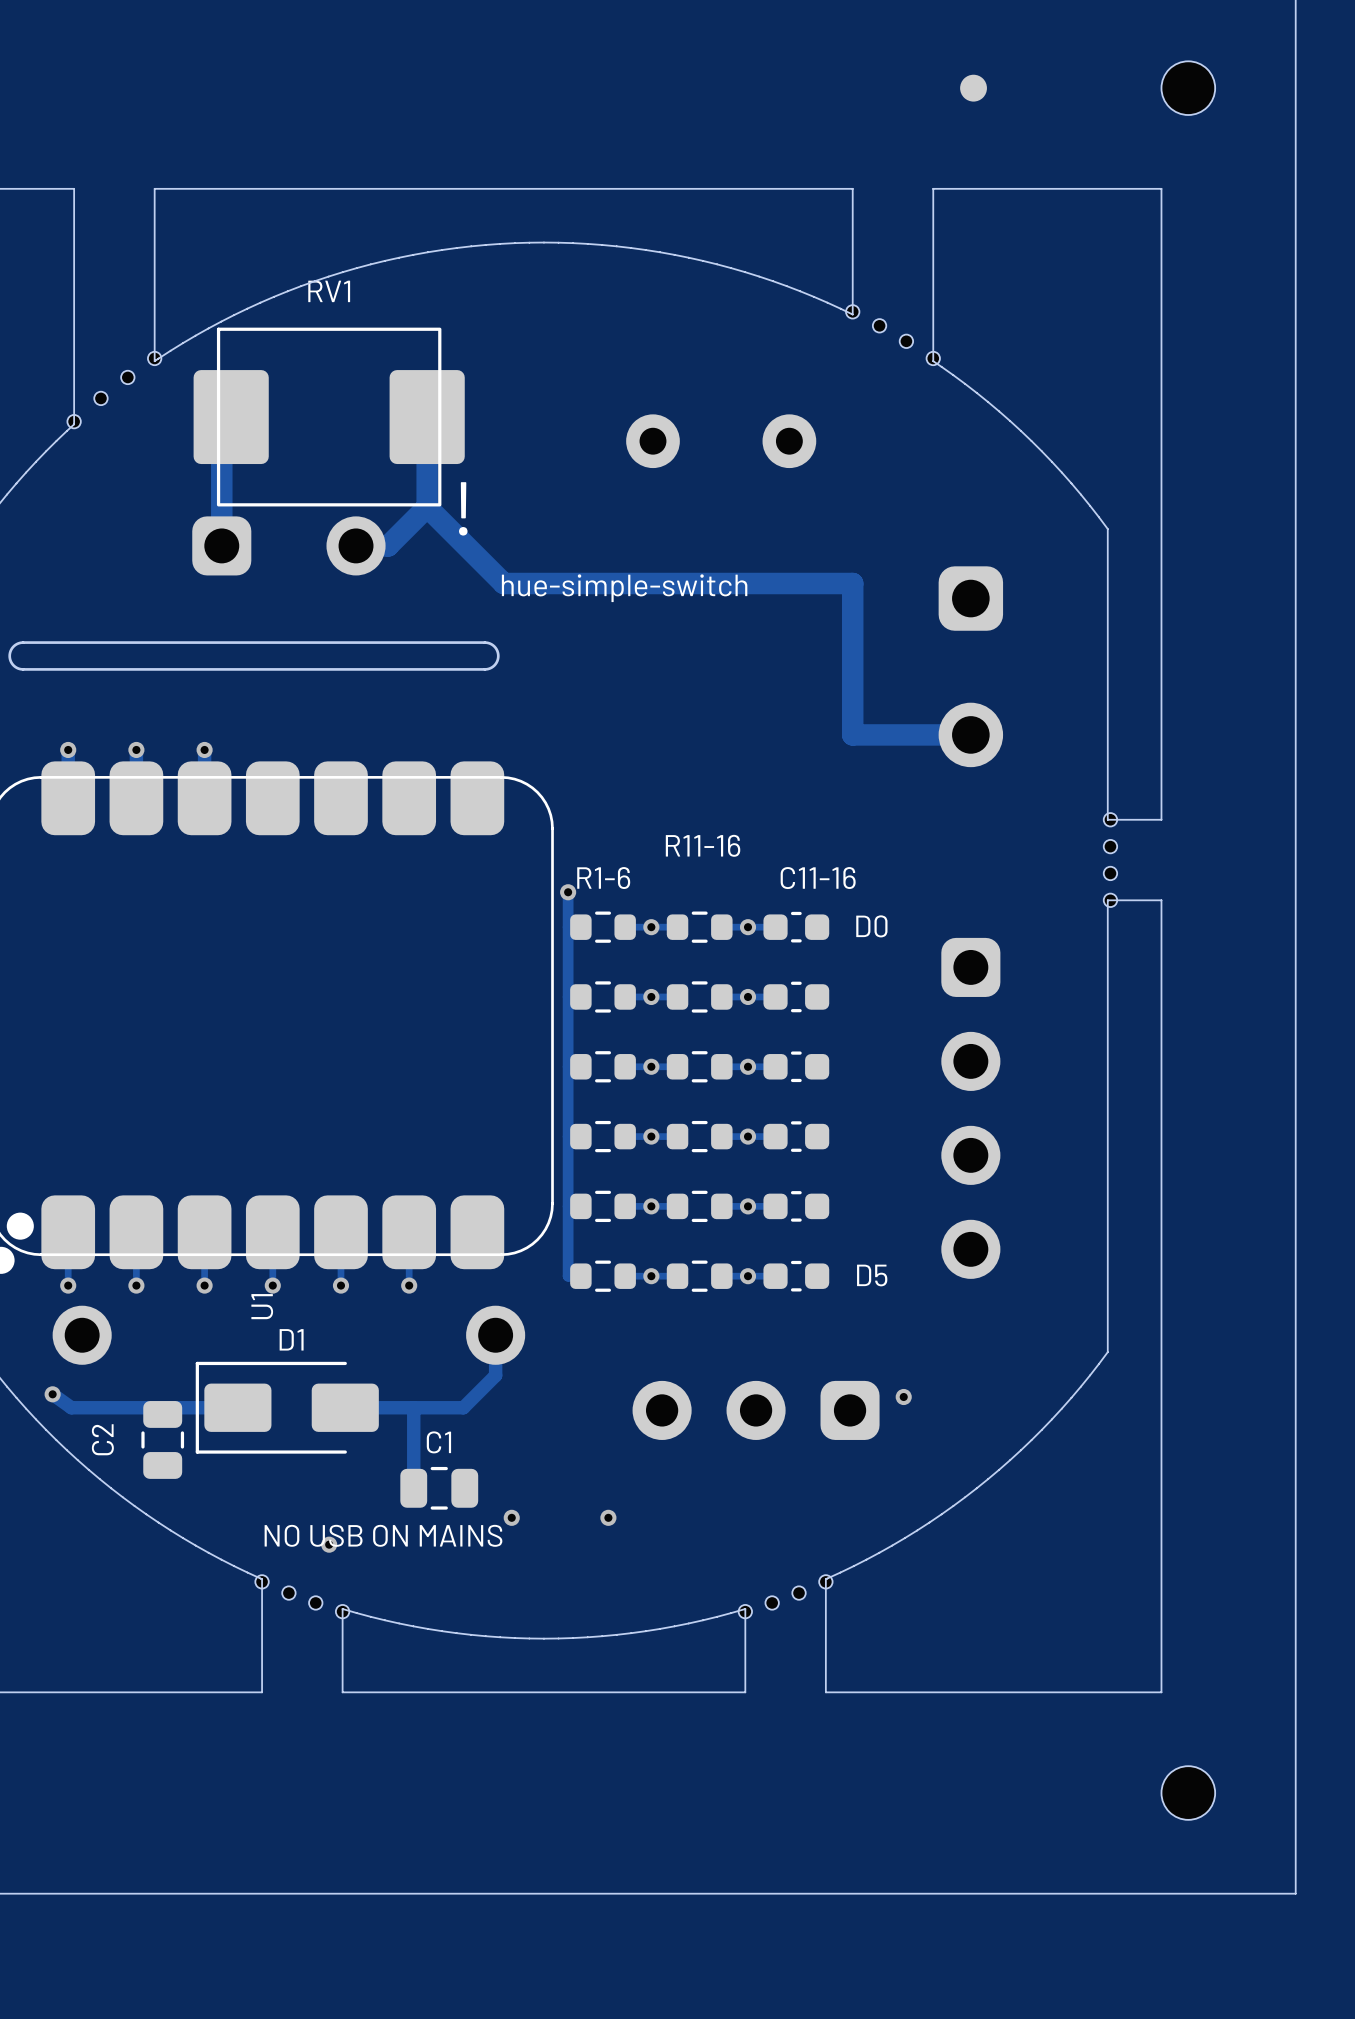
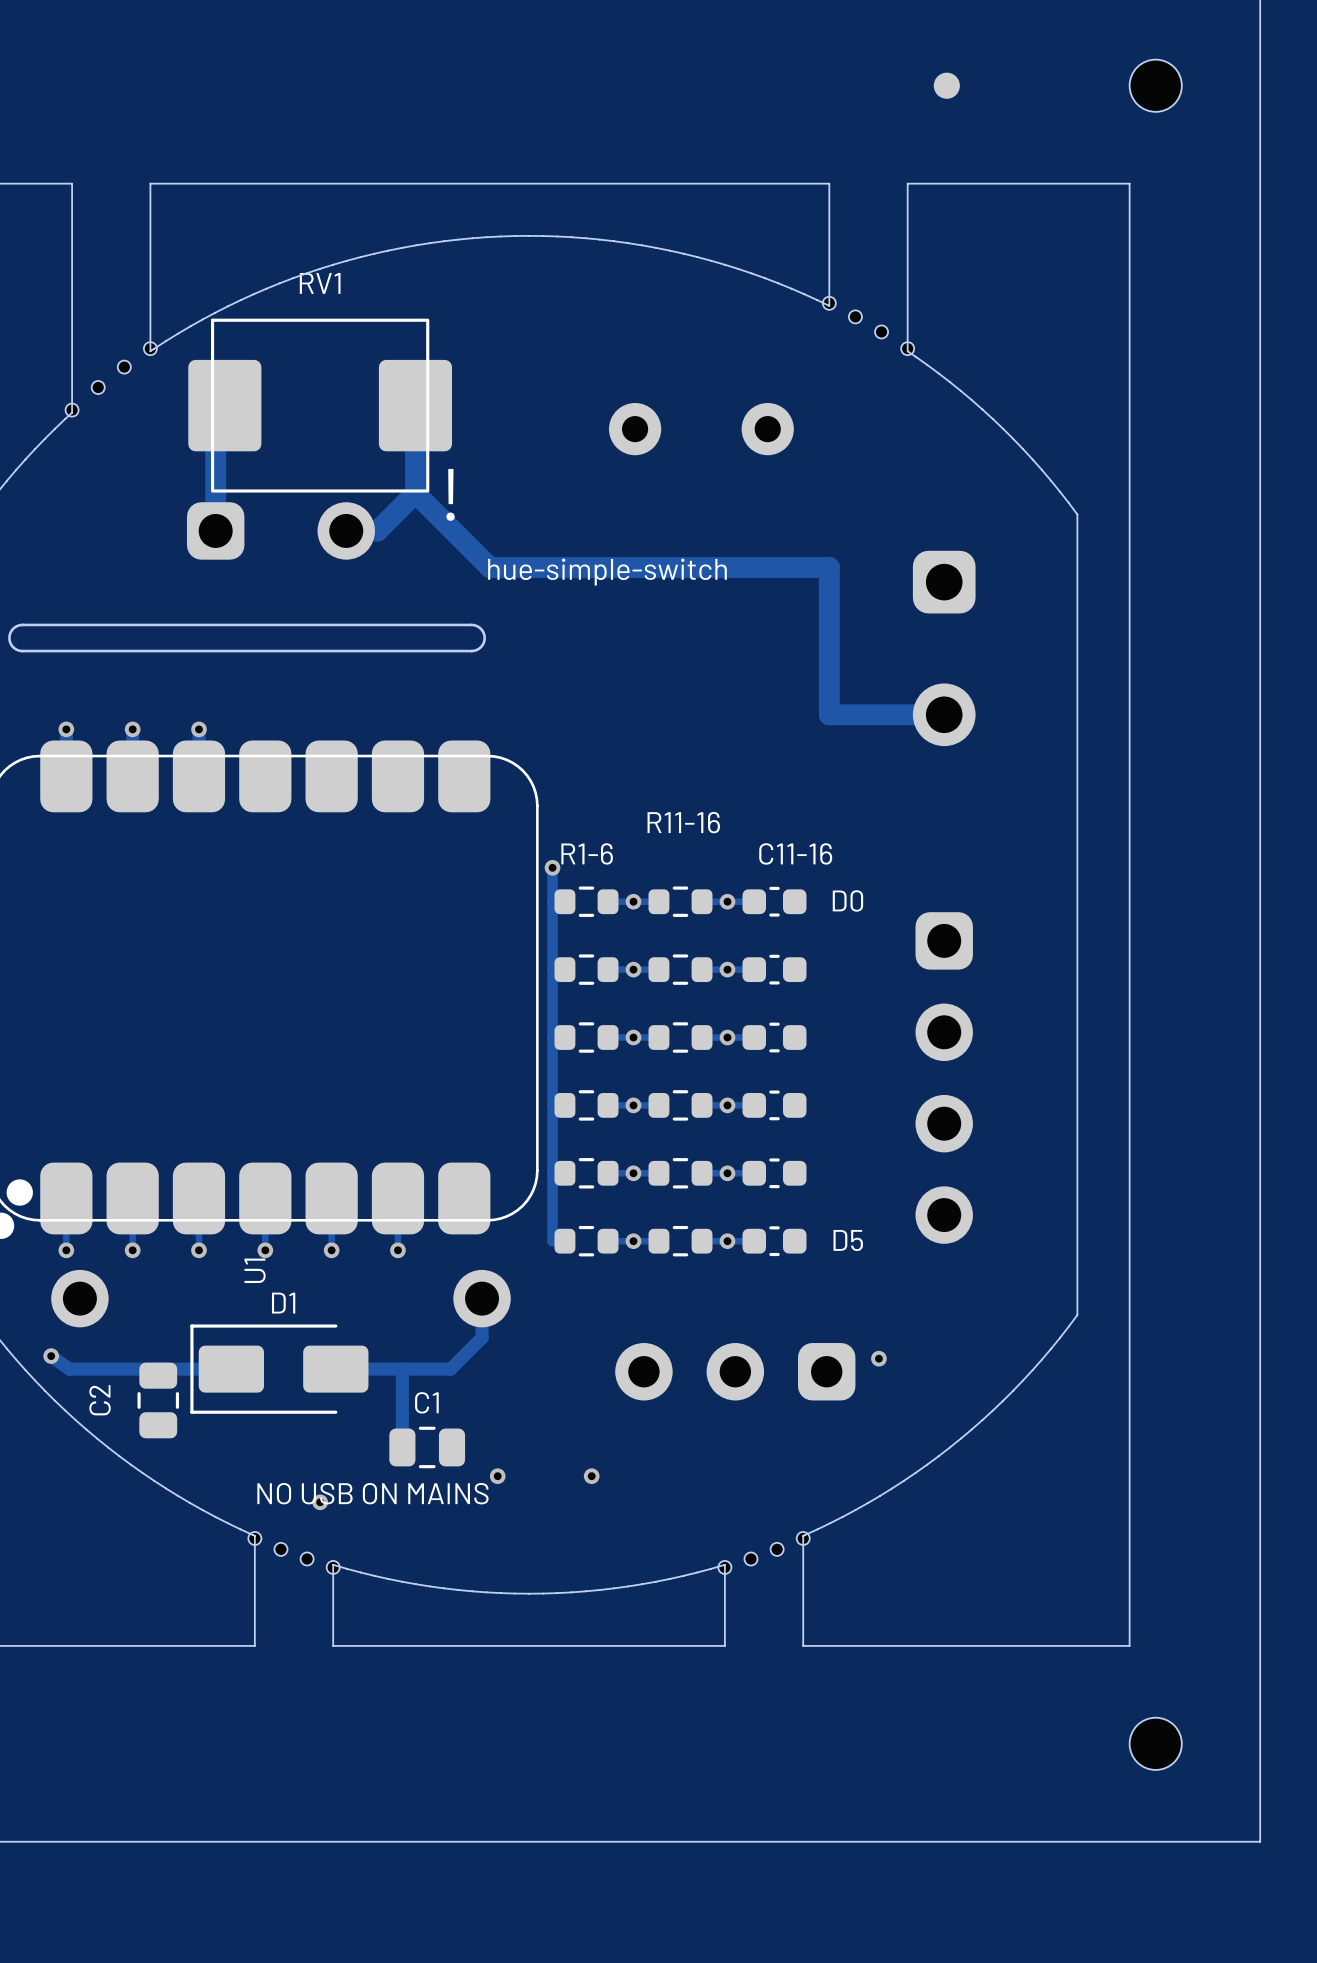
board edge: (1107, 819) (1161, 819) -> (1077, 797) (1077, 875)
part: (1110, 819) -> none
part: (1110, 846) -> none
part: (1110, 873) -> none
board edge: (1107, 900) (1161, 900) -> (1129, 797) (1129, 875)
part: (1110, 900) -> none

